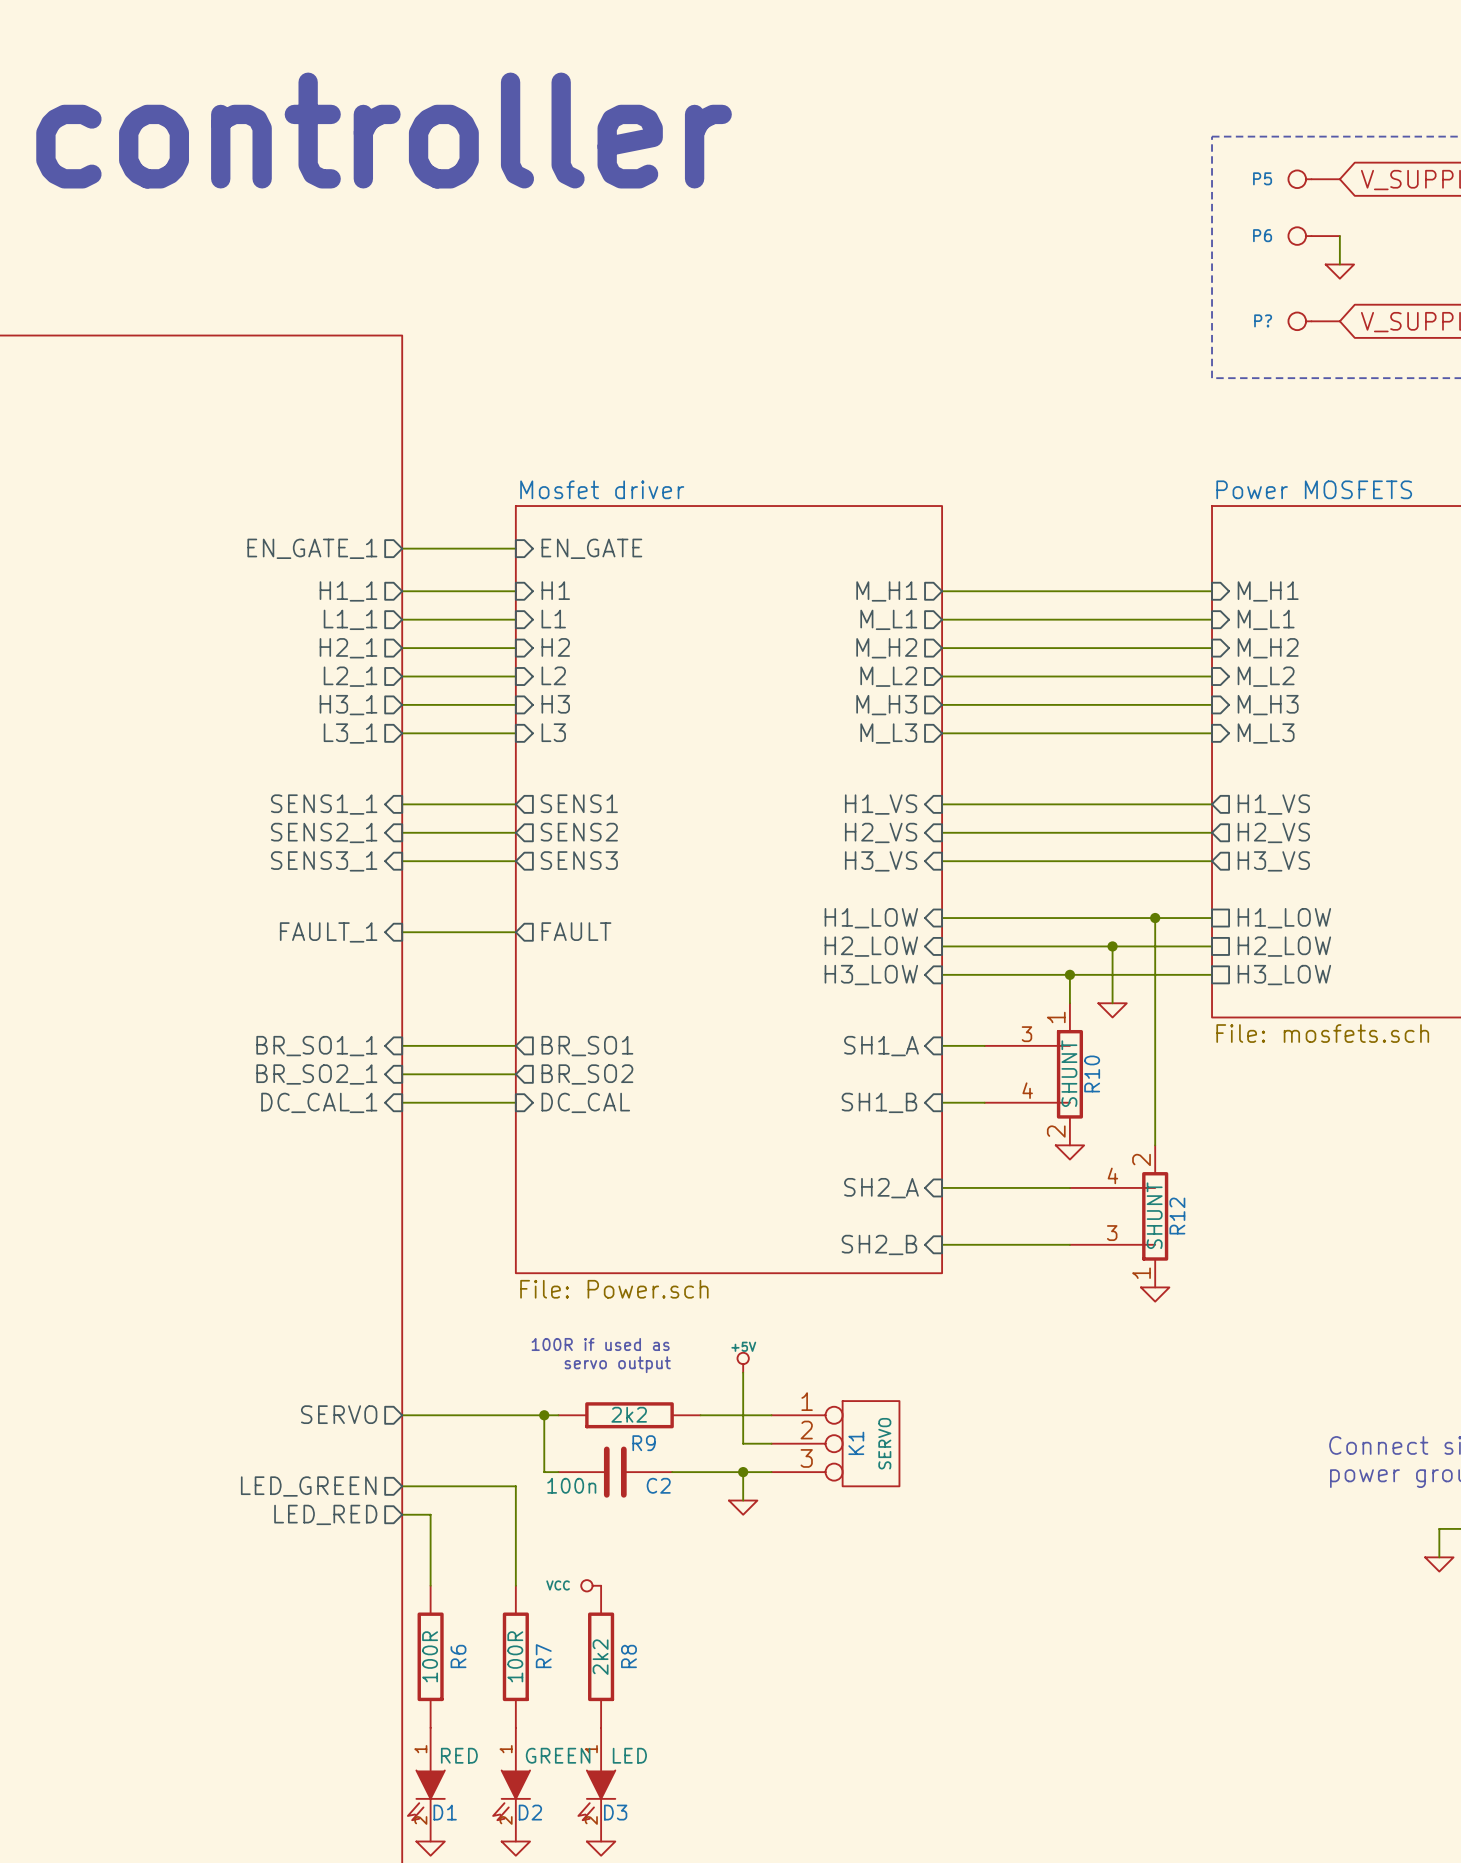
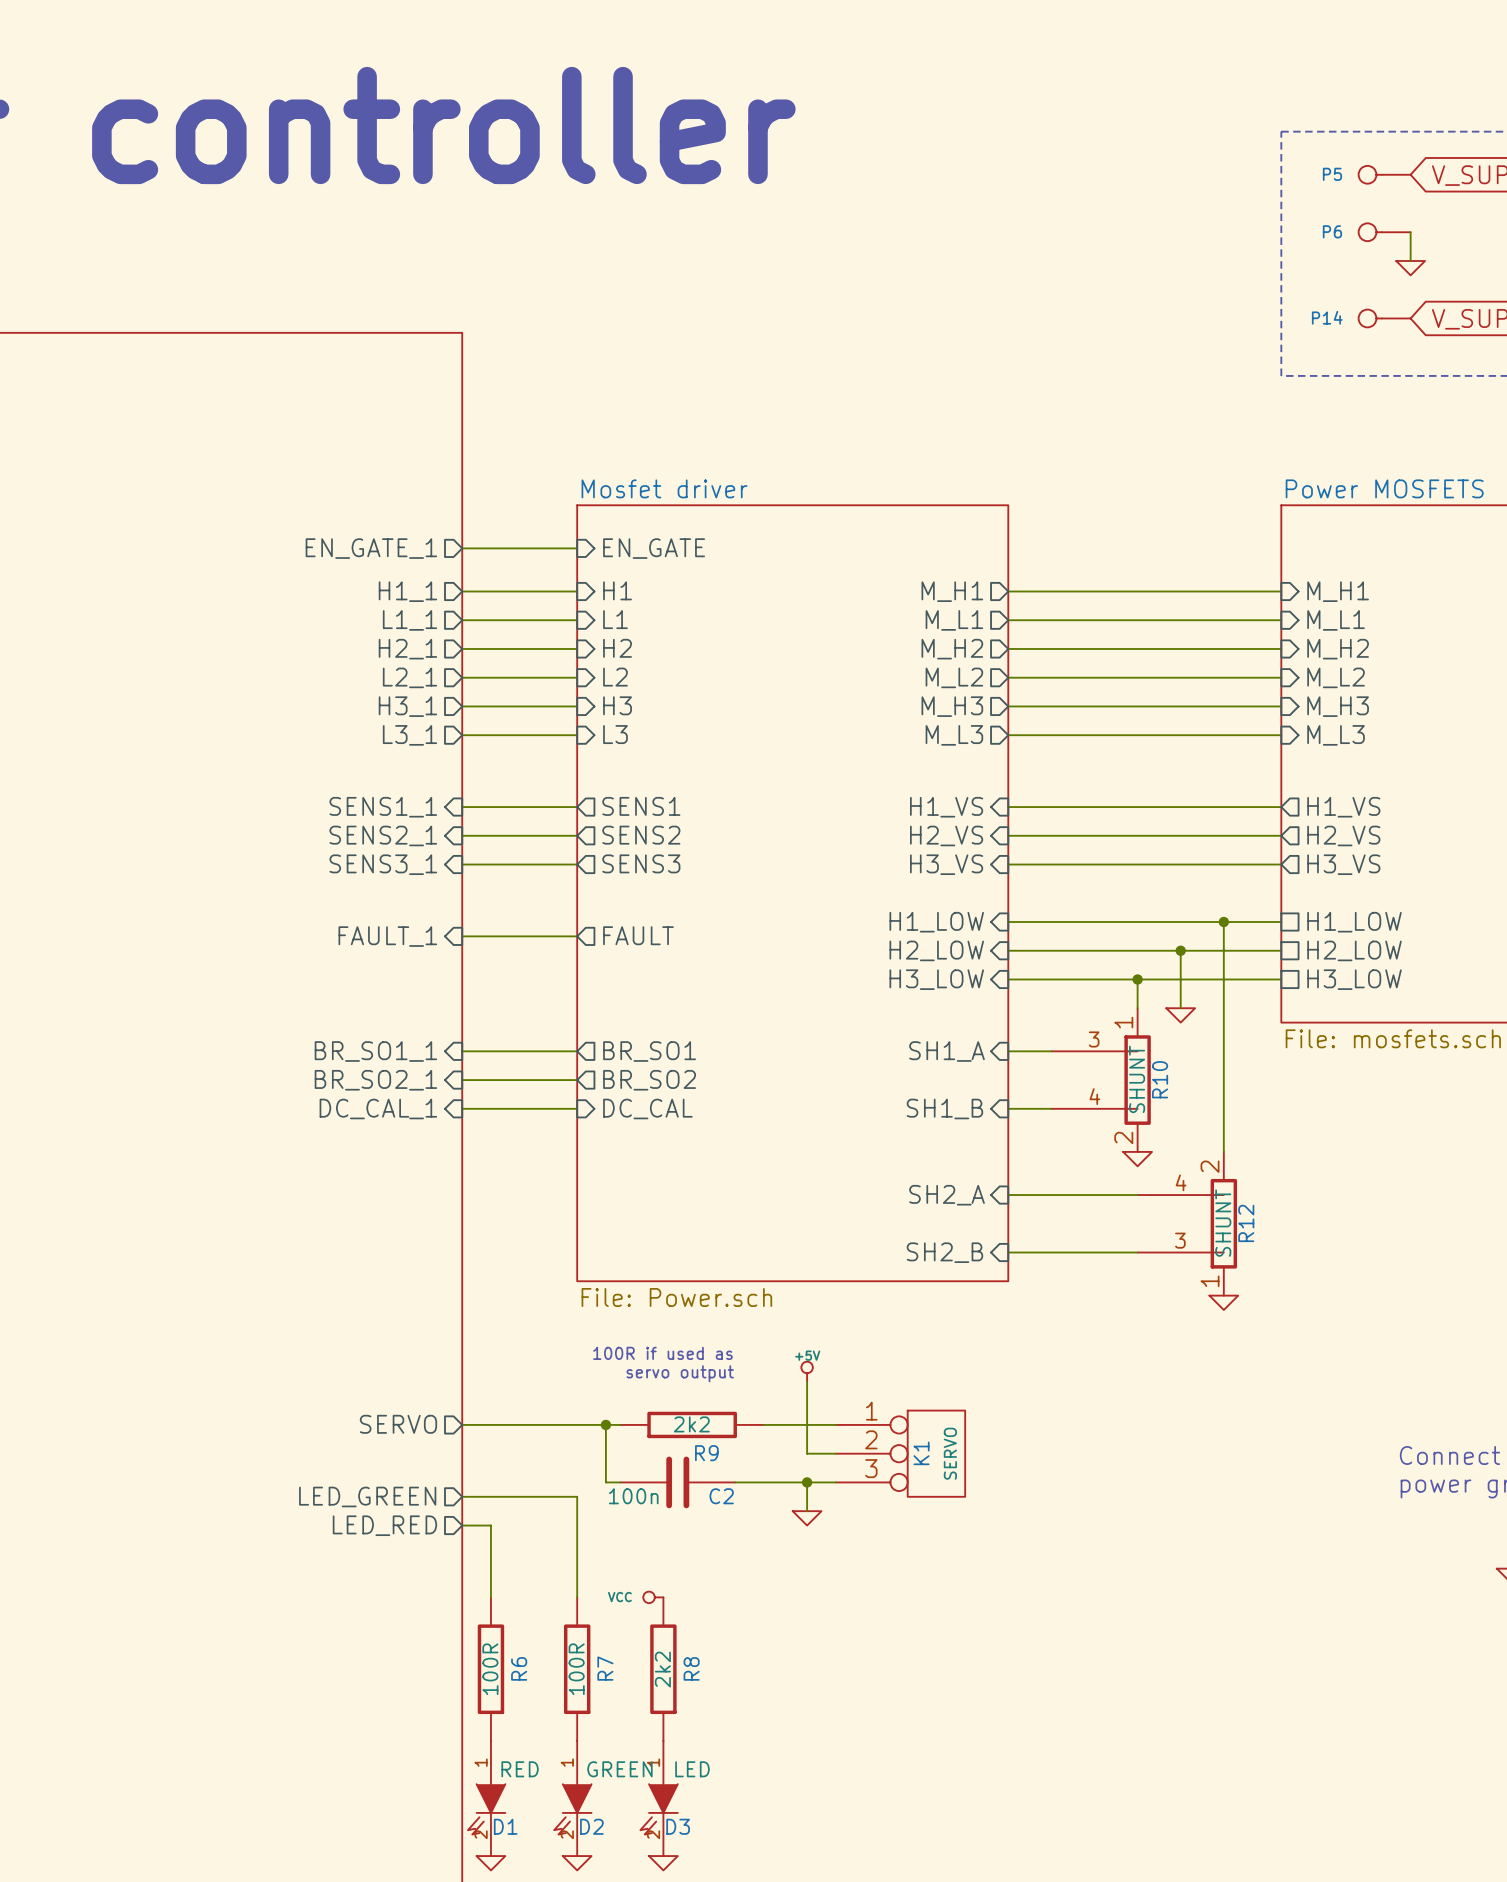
P? name: P? (1263, 320) -> P14 (1327, 317)

